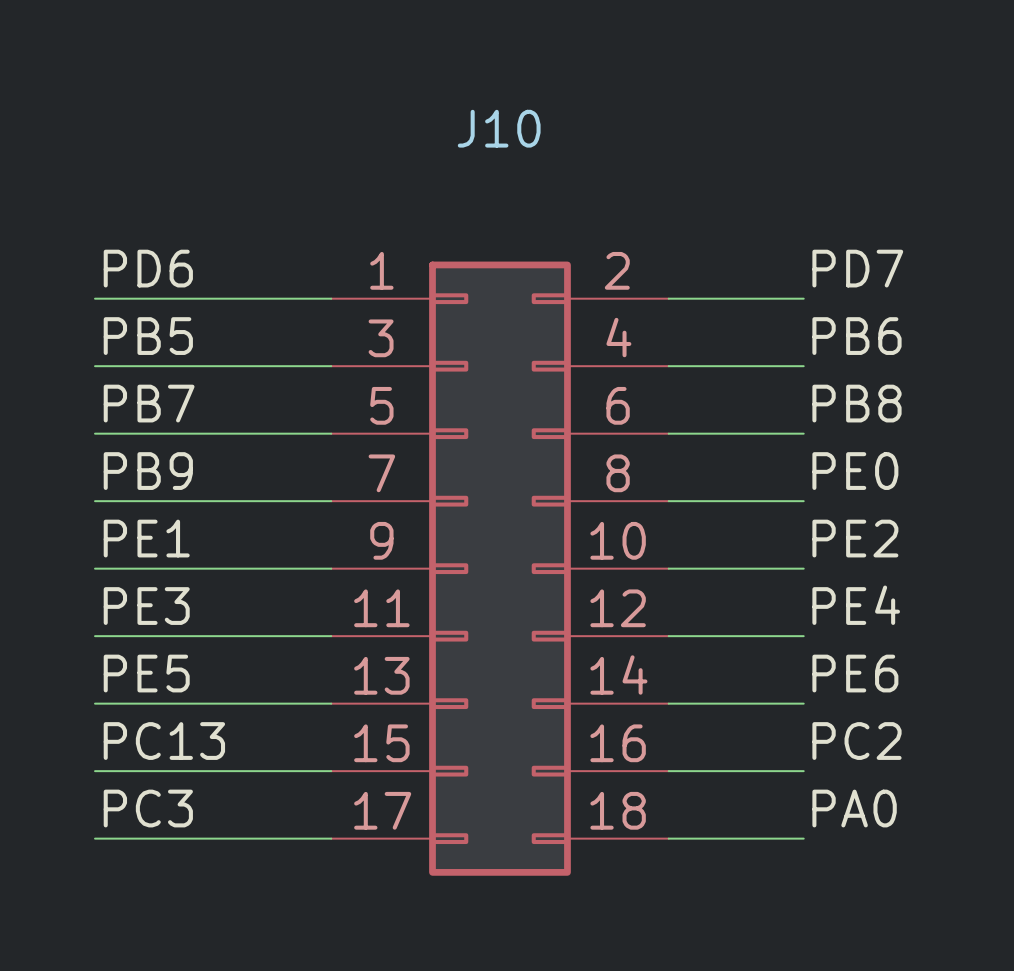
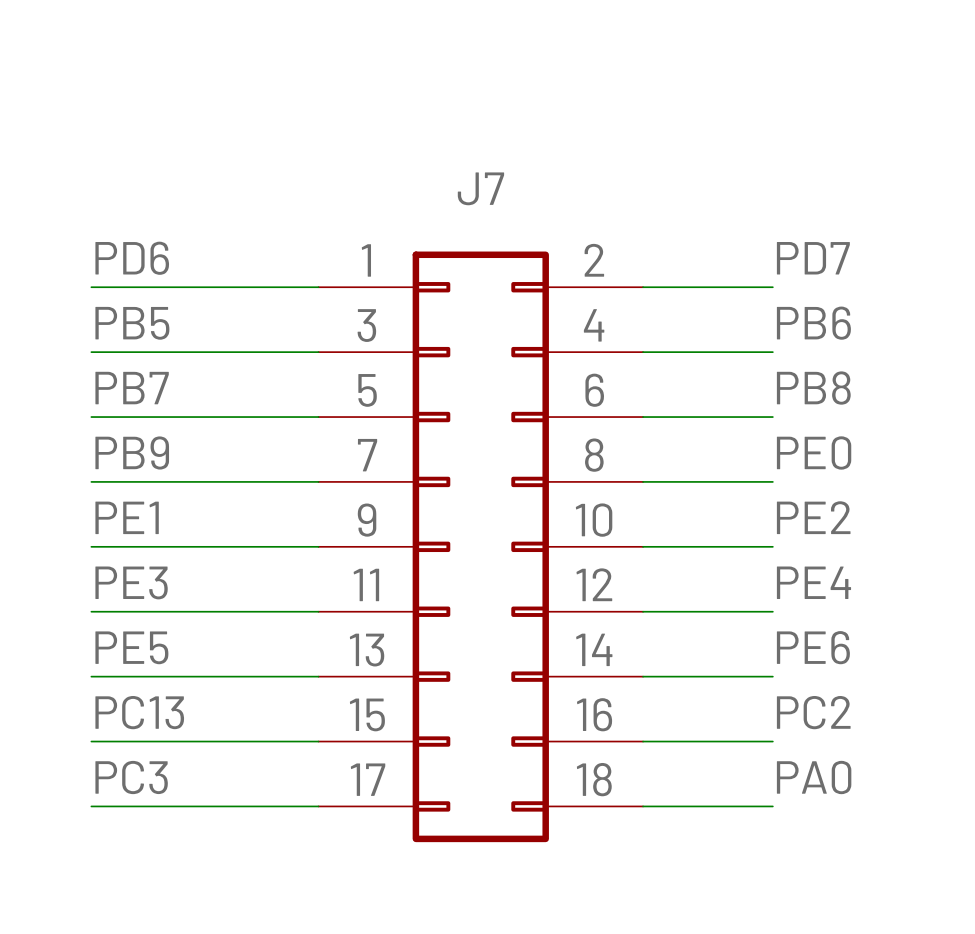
J10 name: J10 (499, 128) -> J7 (480, 188)

